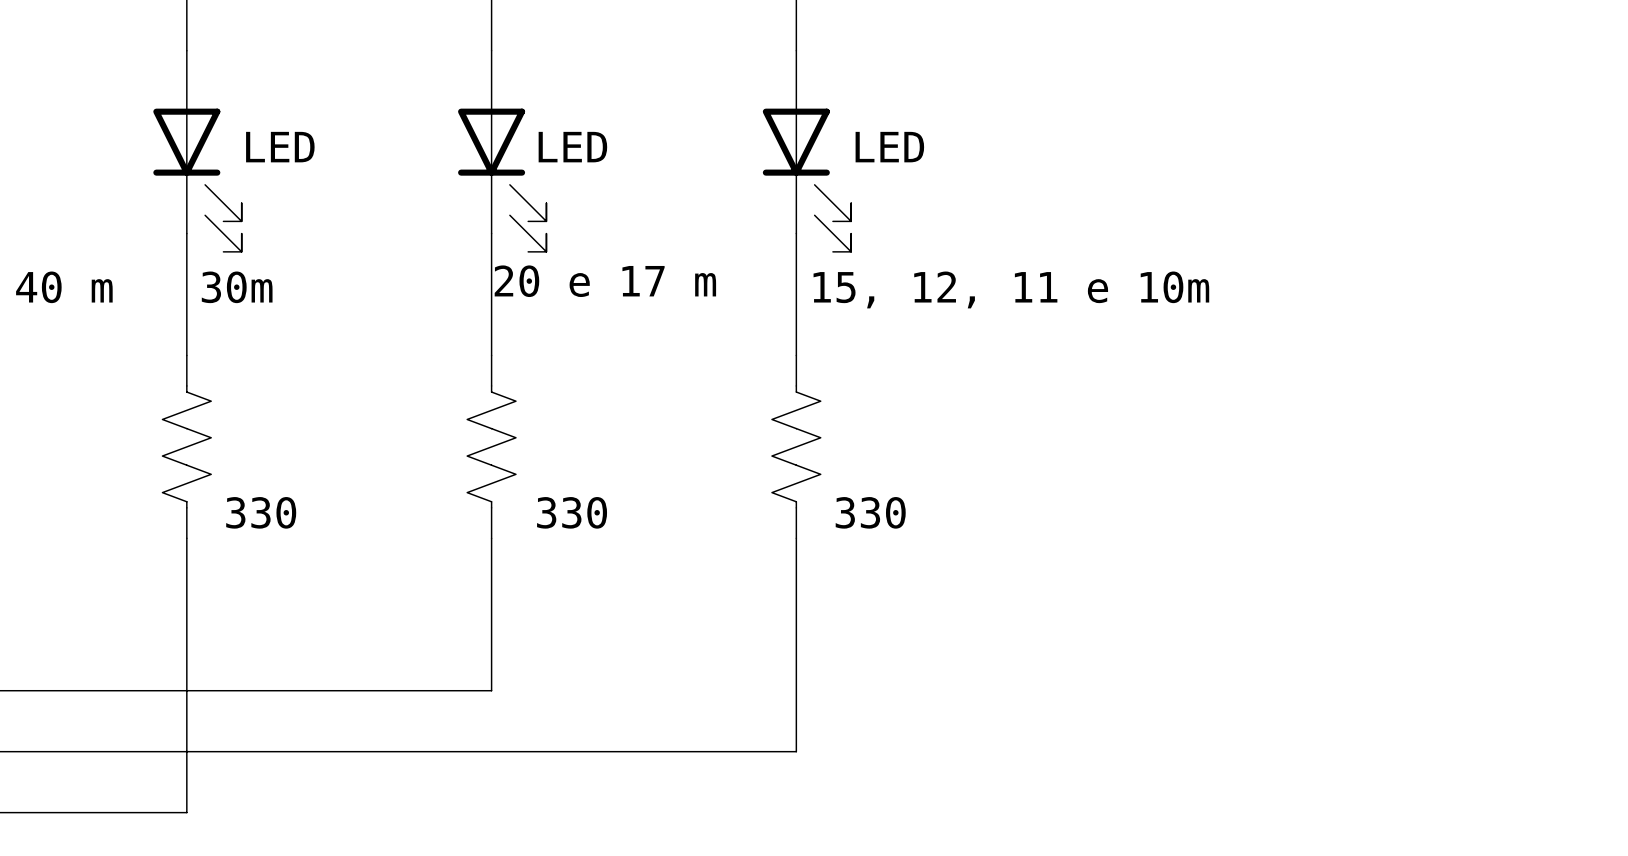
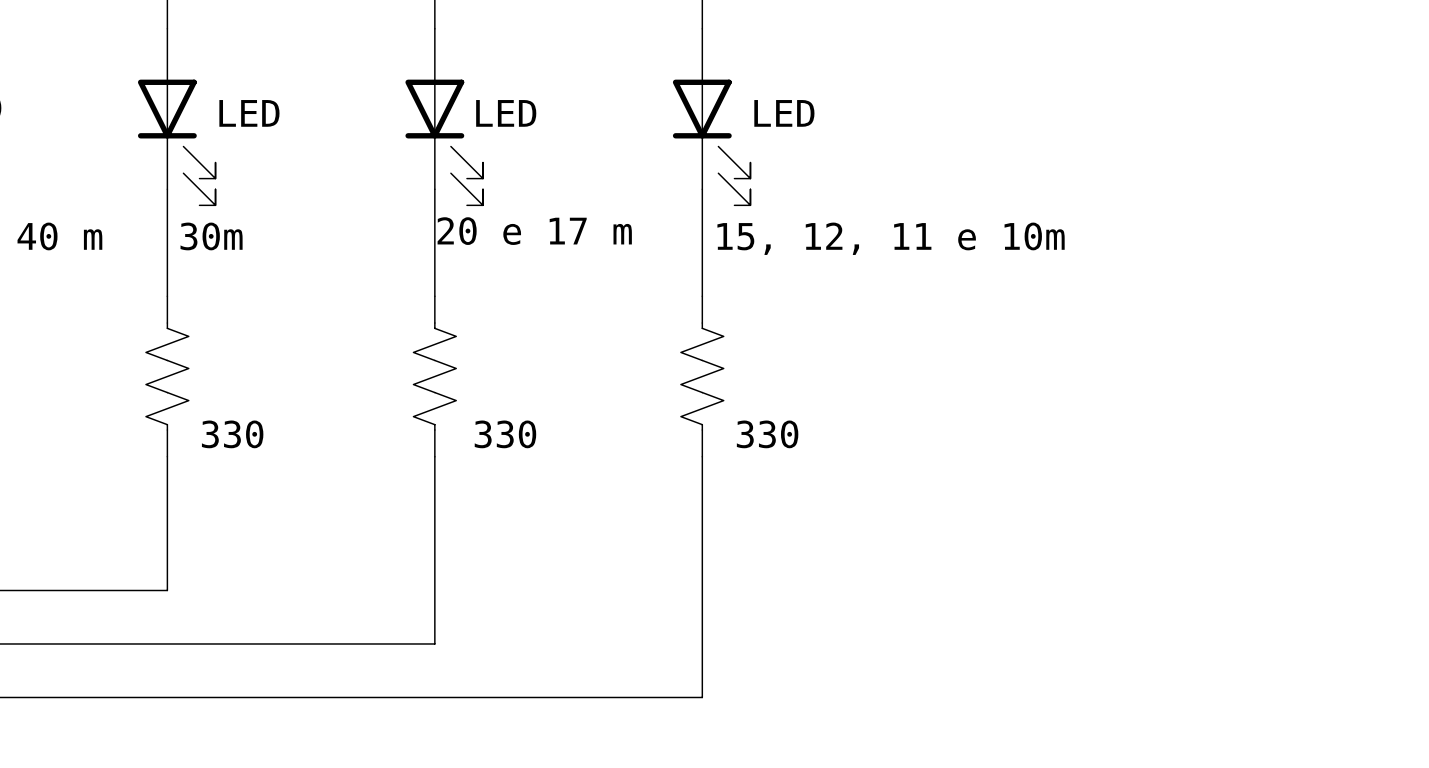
wire: (491, 690) (186, 690) (186, 812) -> (702, 643) (702, 697) (167, 697)
wire: (491, 751) (796, 751) -> (434, 643) (434, 590)

